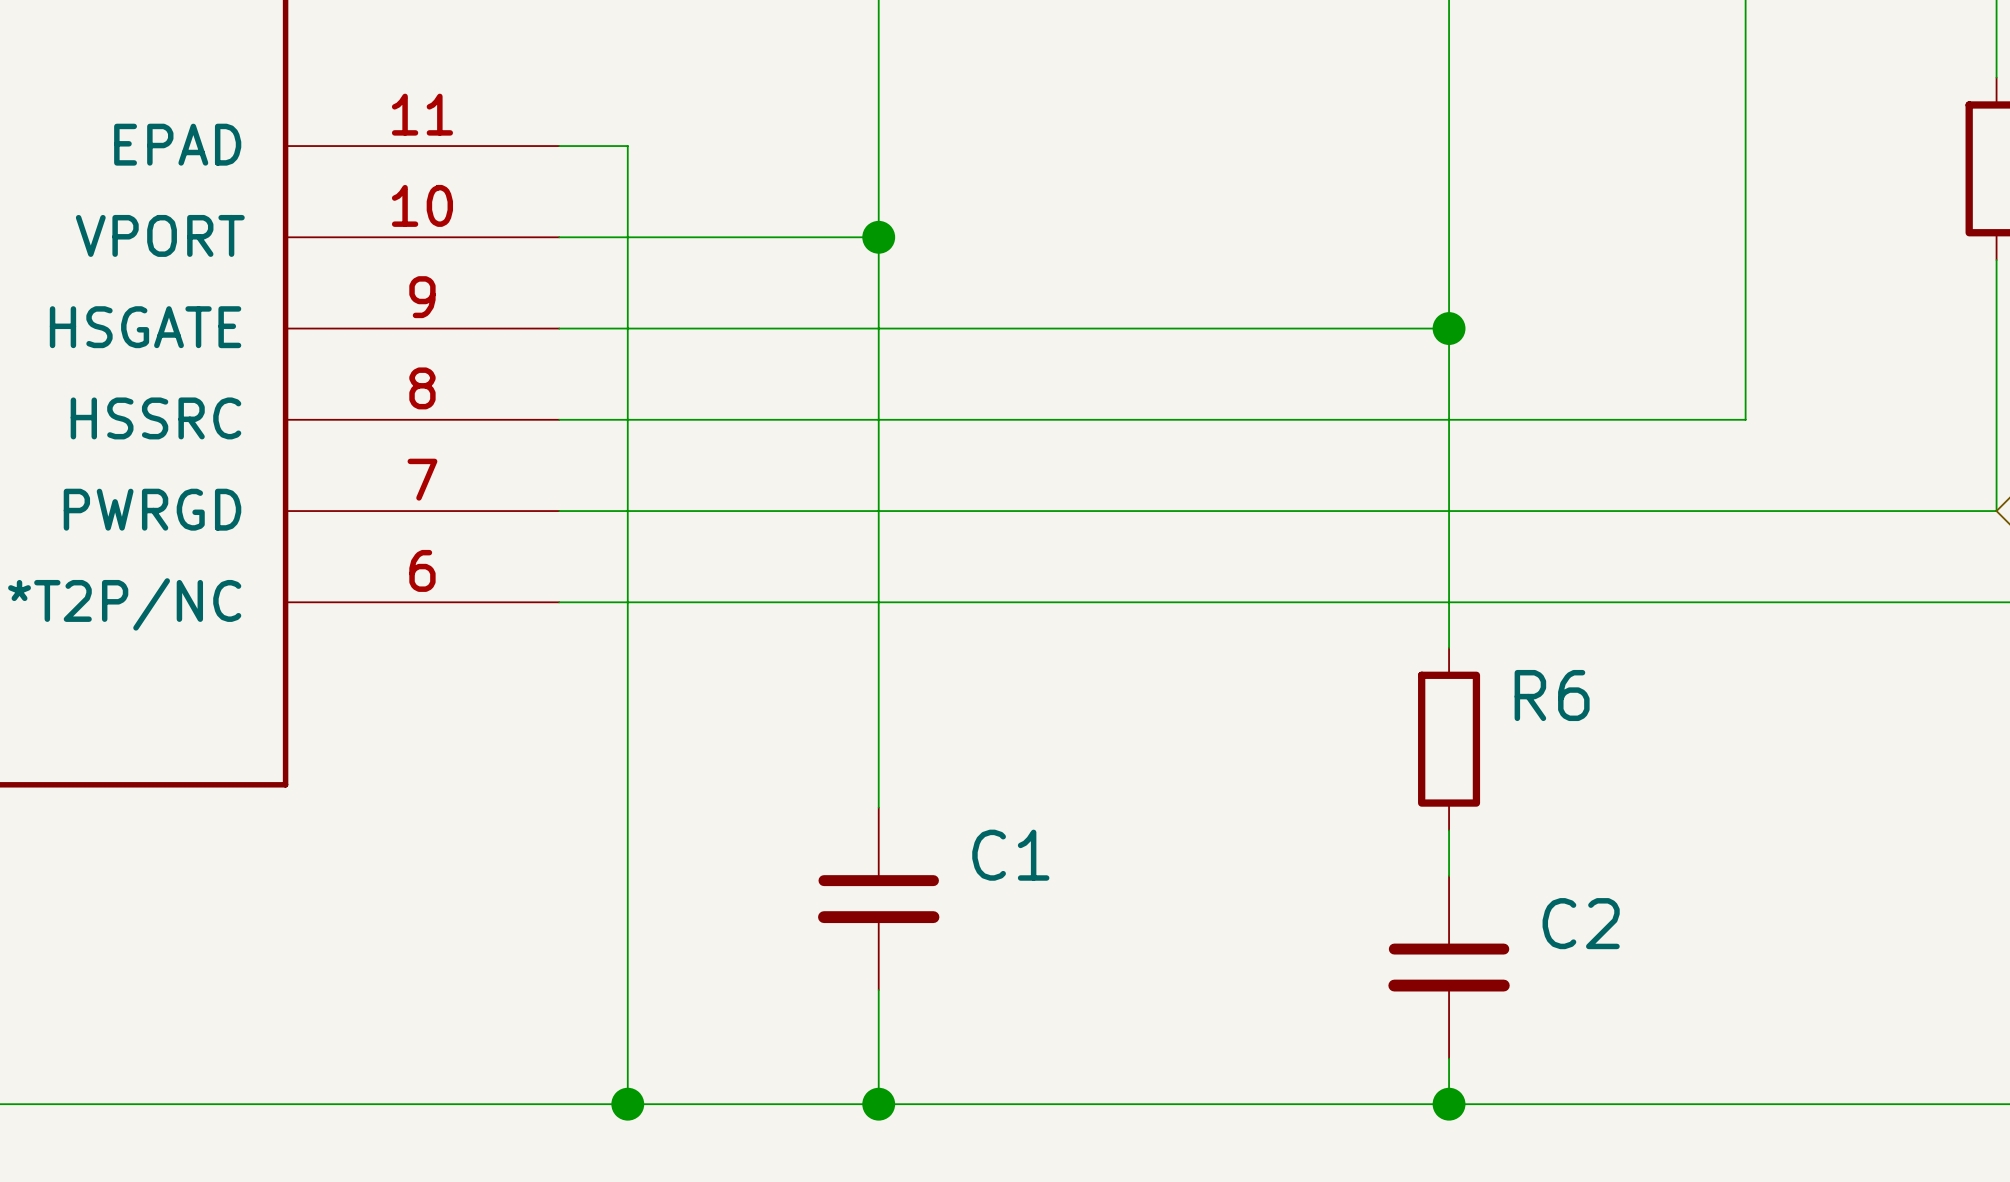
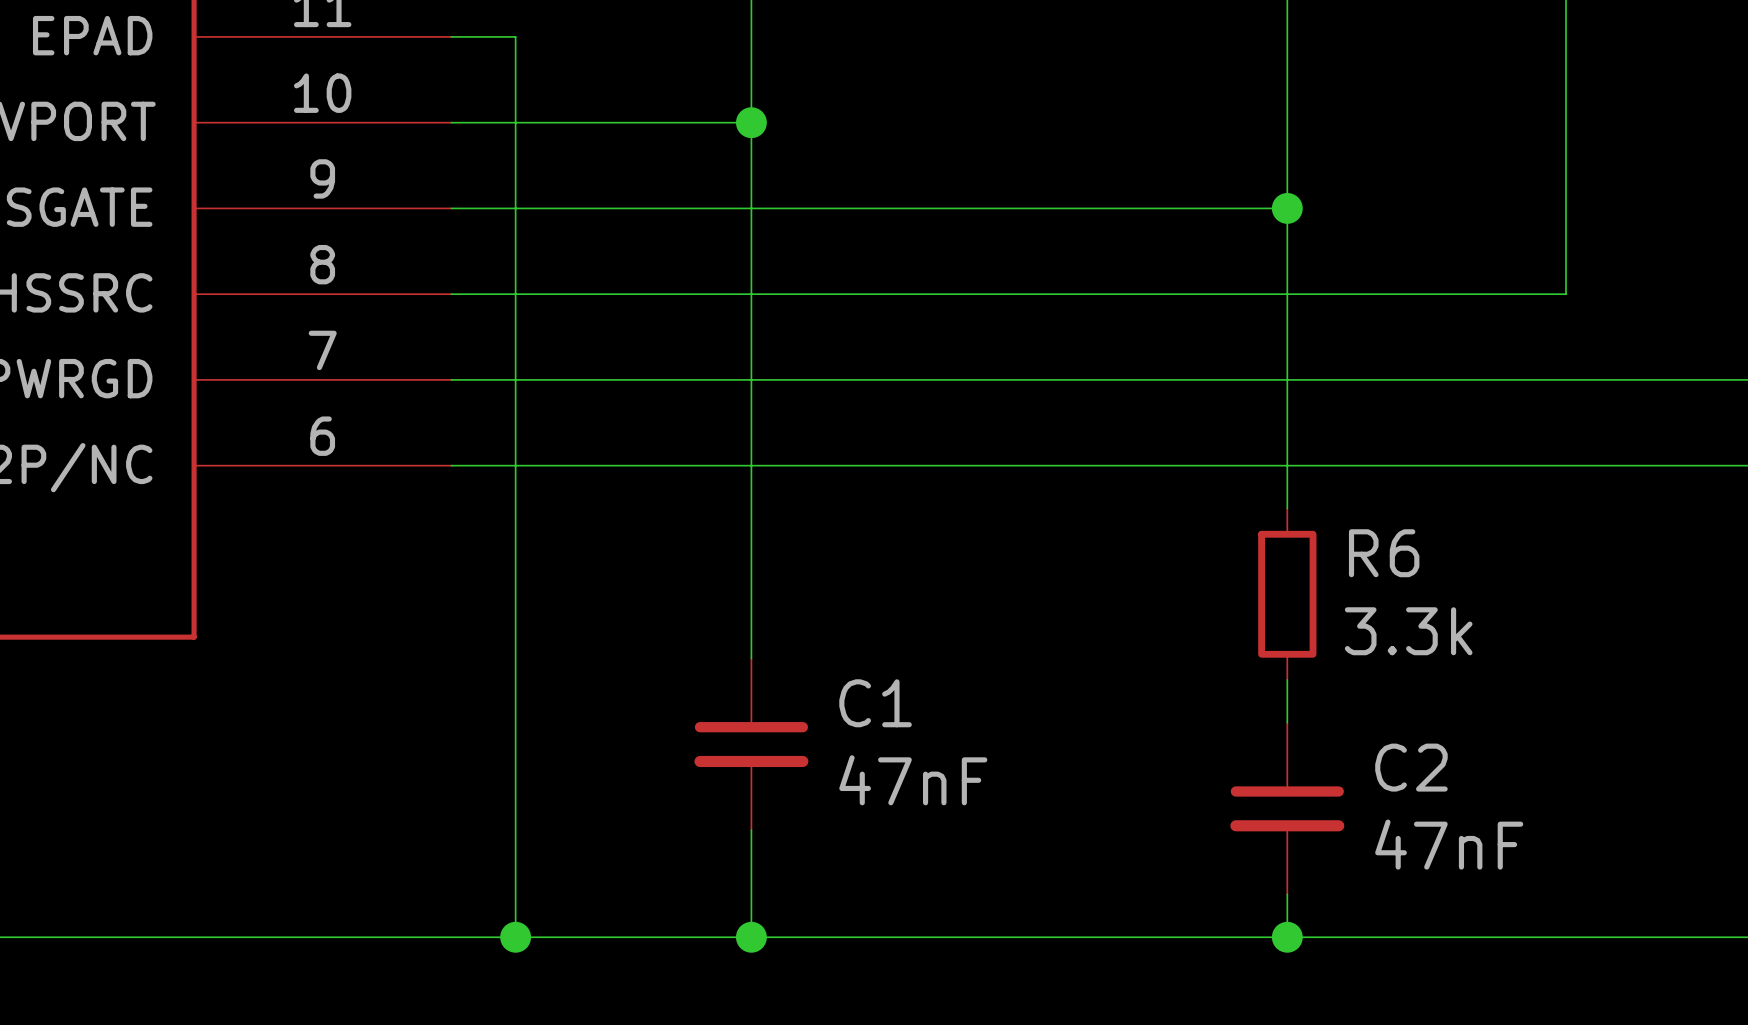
R6 value: none -> 3.3k (1408, 631)
C1 value: none -> 47nF (913, 780)
C2 value: none -> 47nF (1449, 844)

